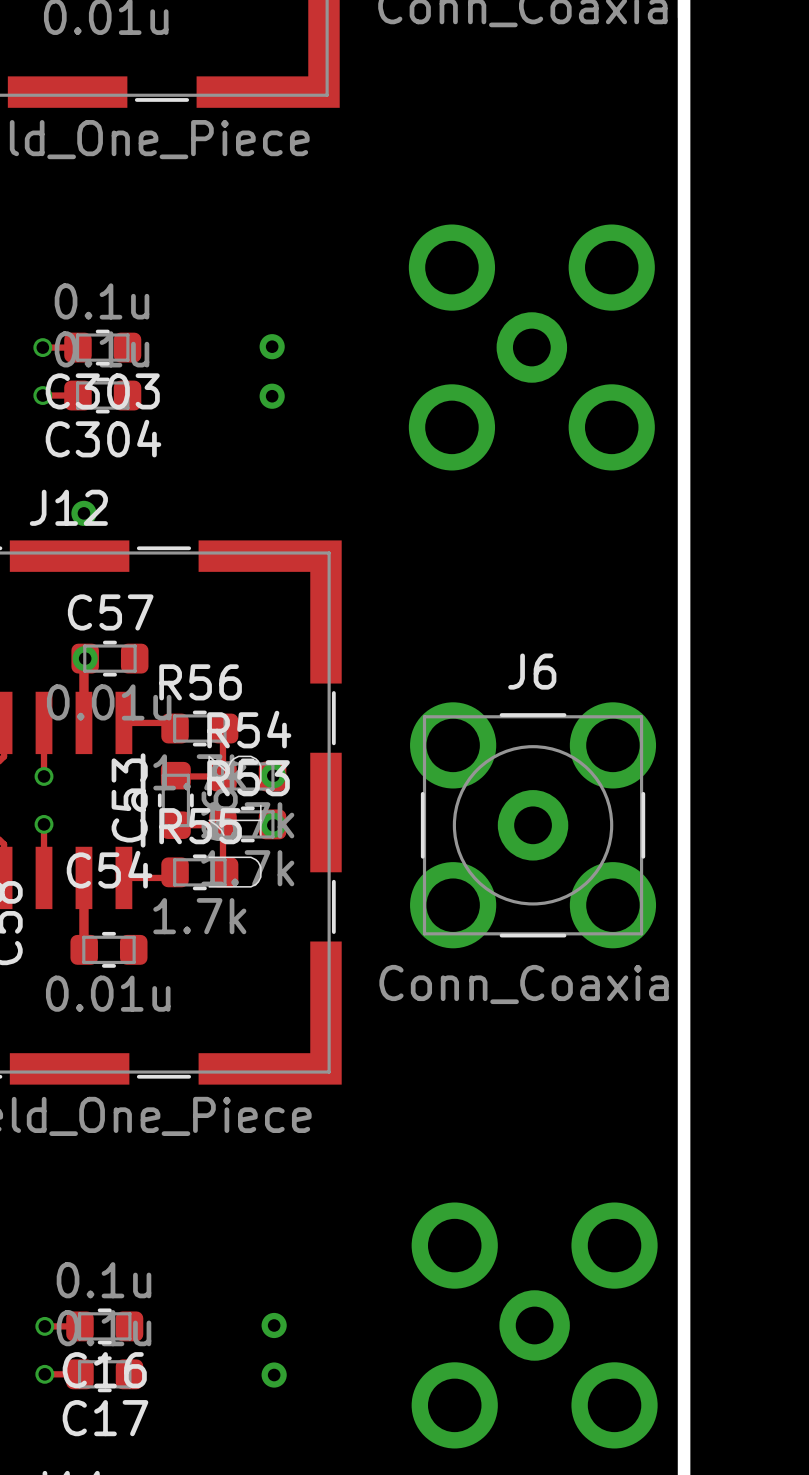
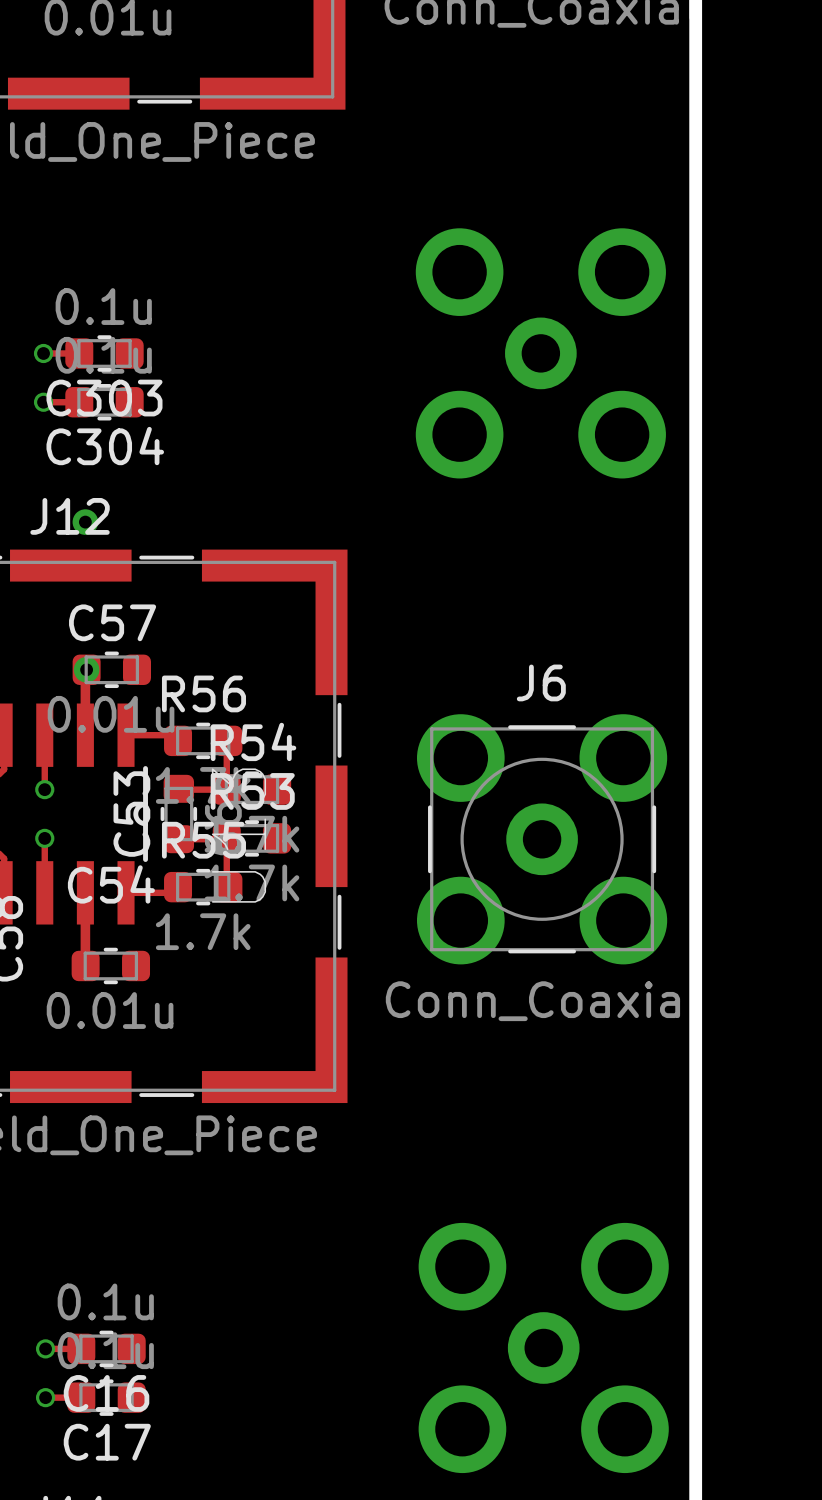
via: (272, 346) -> none
via: (272, 396) -> none
via: (273, 775) -> none
via: (273, 825) -> none
via: (274, 1325) -> none
via: (274, 1375) -> none

